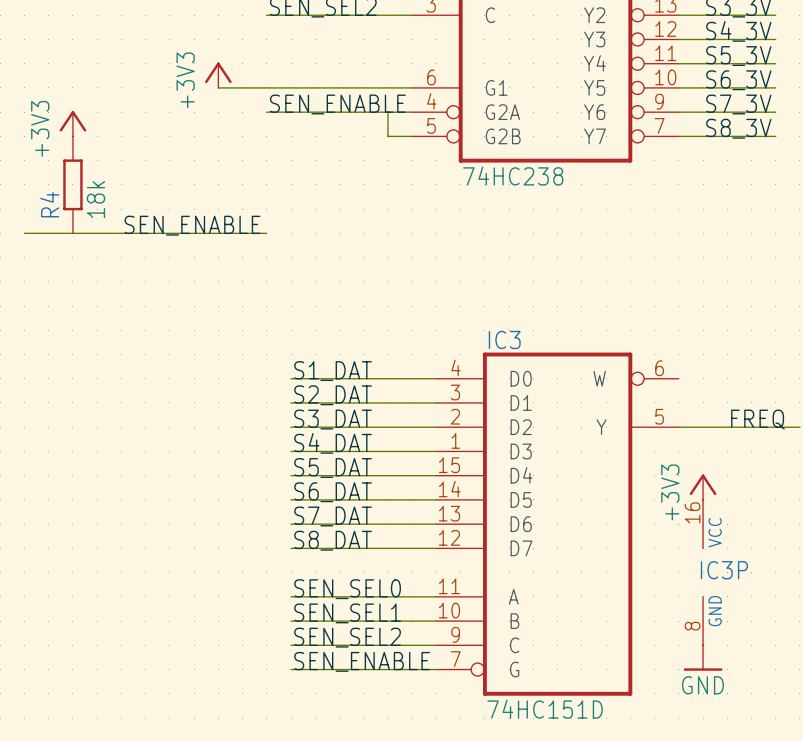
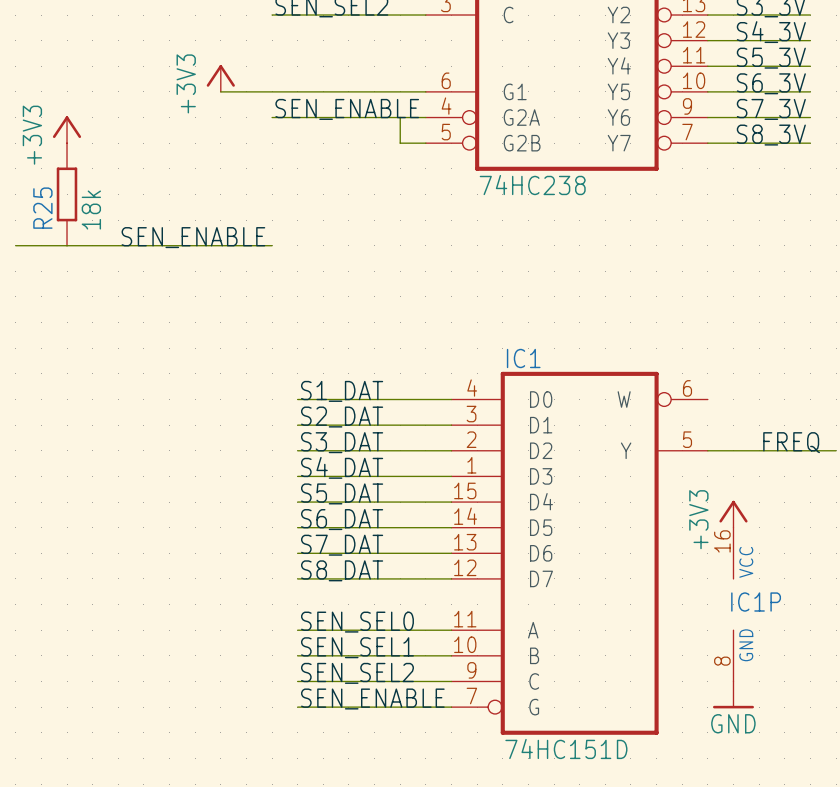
R4 name: R4 (49, 204) -> R25 (42, 208)
IC3 name: IC3 (504, 339) -> IC1 (523, 358)
IC3P name: IC3P (724, 570) -> IC1P (756, 602)

